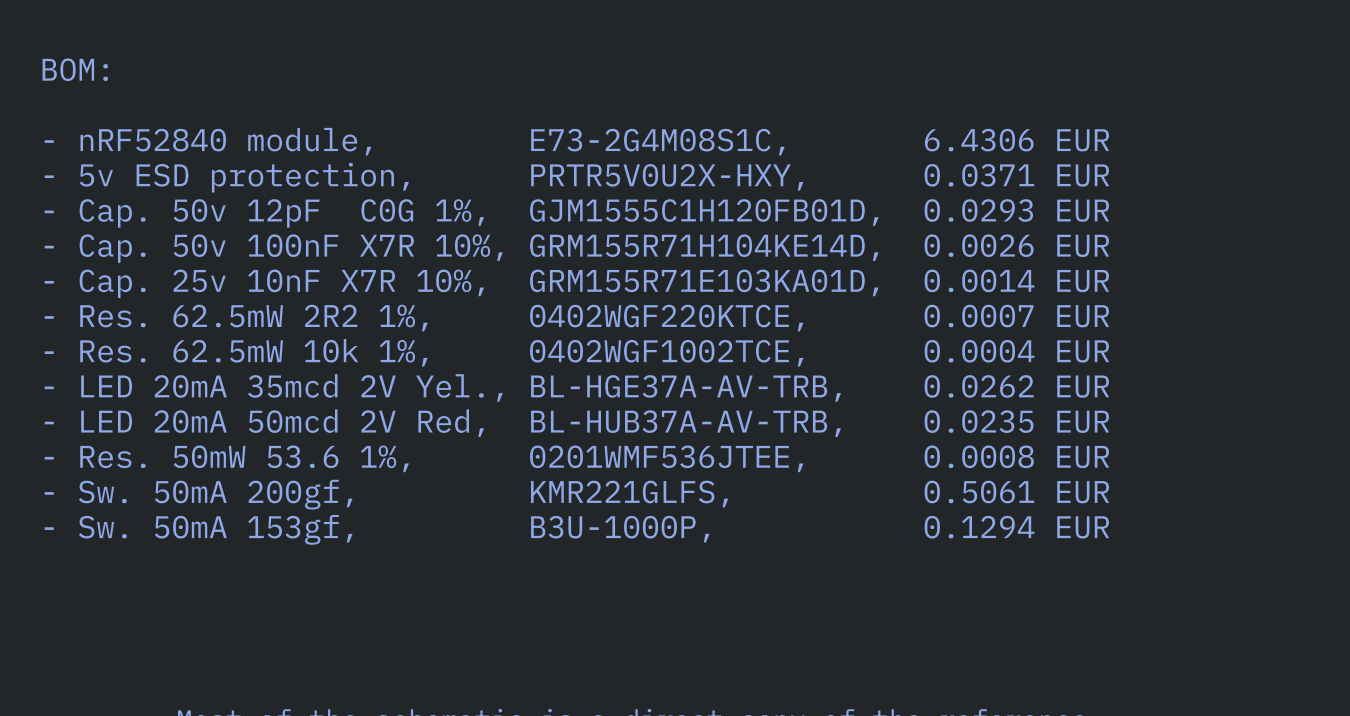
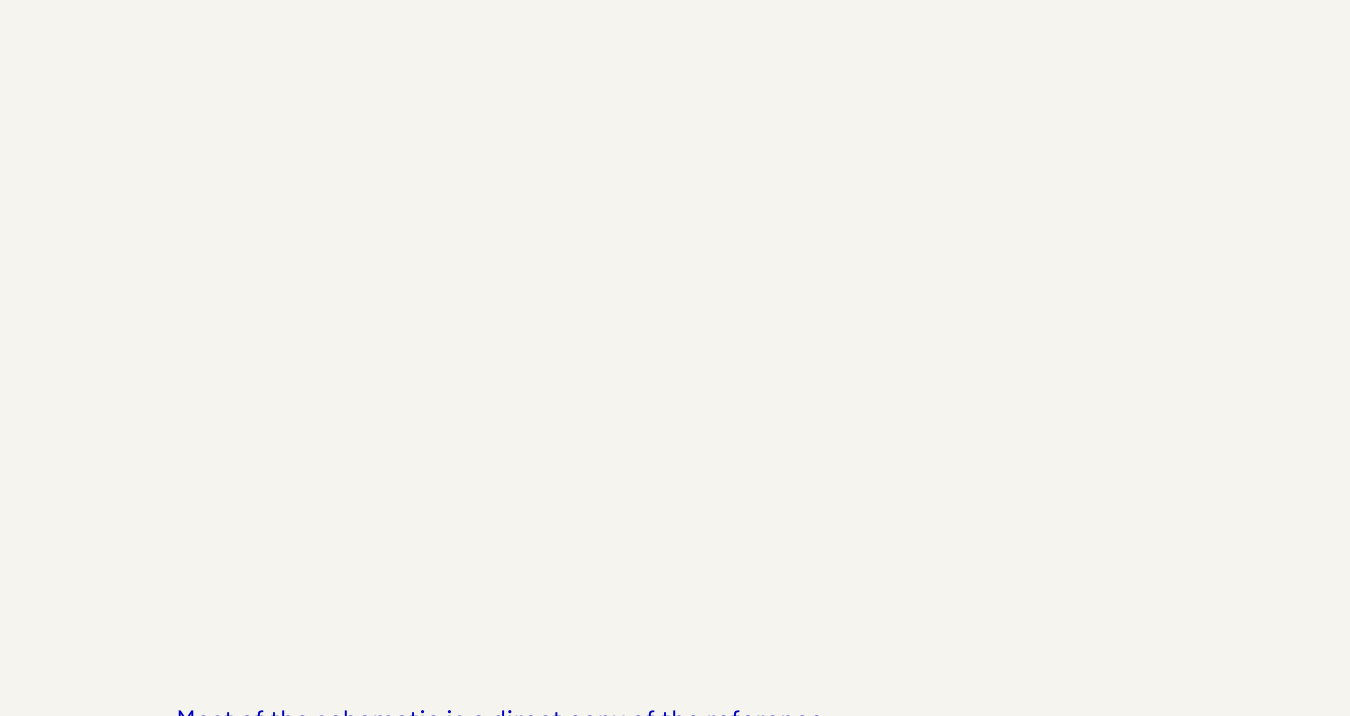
text: BOM: (75, 69) -> none
text: - nRF52840 module, E73-2G4M08S1C, 6.4306 EUR (576, 141) -> none
text: - 5v ESD protection, PRTR5V0U2X-HXY, 0.0371 EUR (576, 177) -> none
text: - Cap. 50v 12pF C0G 1%, GJM1555C1H120FB01D, 0.0293 EUR (576, 213) -> none
text: - Cap. 50v 100nF X7R 10%, GRM155R71H104KE14D, 0.0026 EUR (576, 248) -> none
text: - Cap. 25v 10nF X7R 10%, GRM155R71E103KA01D, 0.0014 EUR (576, 283) -> none
text: - Res. 62.5mW 2R2 1%, 0402WGF220KTCE, 0.0007 EUR (576, 318) -> none
text: - Res. 62.5mW 10k 1%, 0402WGF1002TCE, 0.0004 EUR (576, 352) -> none
text: - LED 20mA 35mcd 2V Yel., BL-HGE37A-AV-TRB, 0.0262 EUR (576, 387) -> none
text: - LED 20mA 50mcd 2V Red, BL-HUB37A-AV-TRB, 0.0235 EUR (576, 423) -> none
text: - Res. 50mW 53.6 1%, 0201WMF536JTEE, 0.0008 EUR (576, 458) -> none
text: - Sw. 50mA 200gf, KMR221GLFS, 0.5061 EUR (576, 494) -> none
text: - Sw. 50mA 153gf, B3U-1000P, 0.1294 EUR (576, 529) -> none

